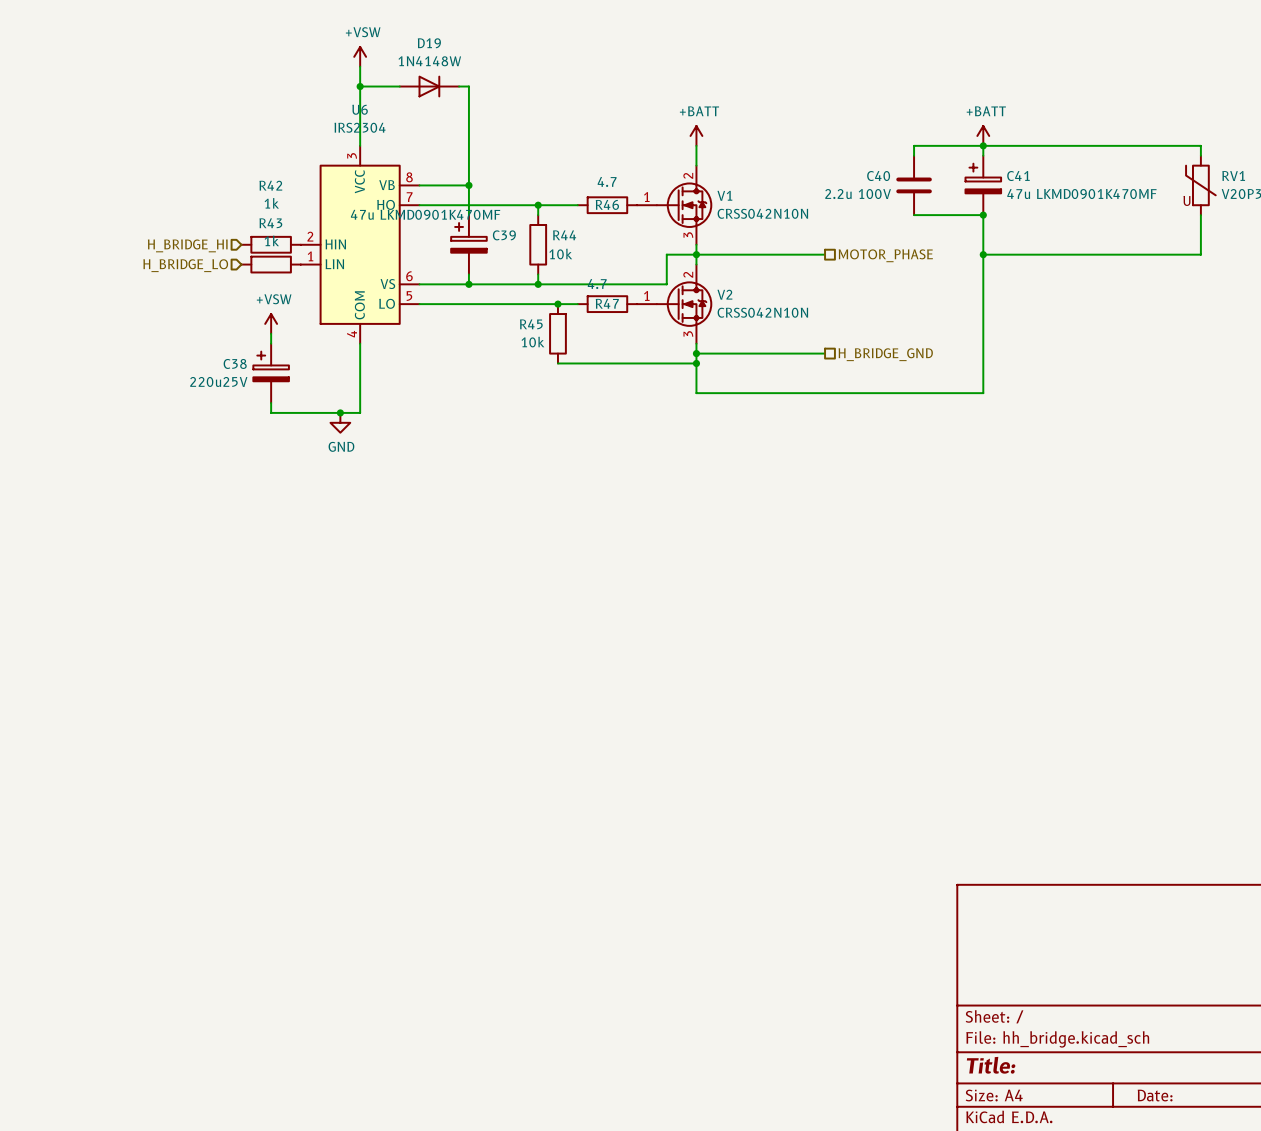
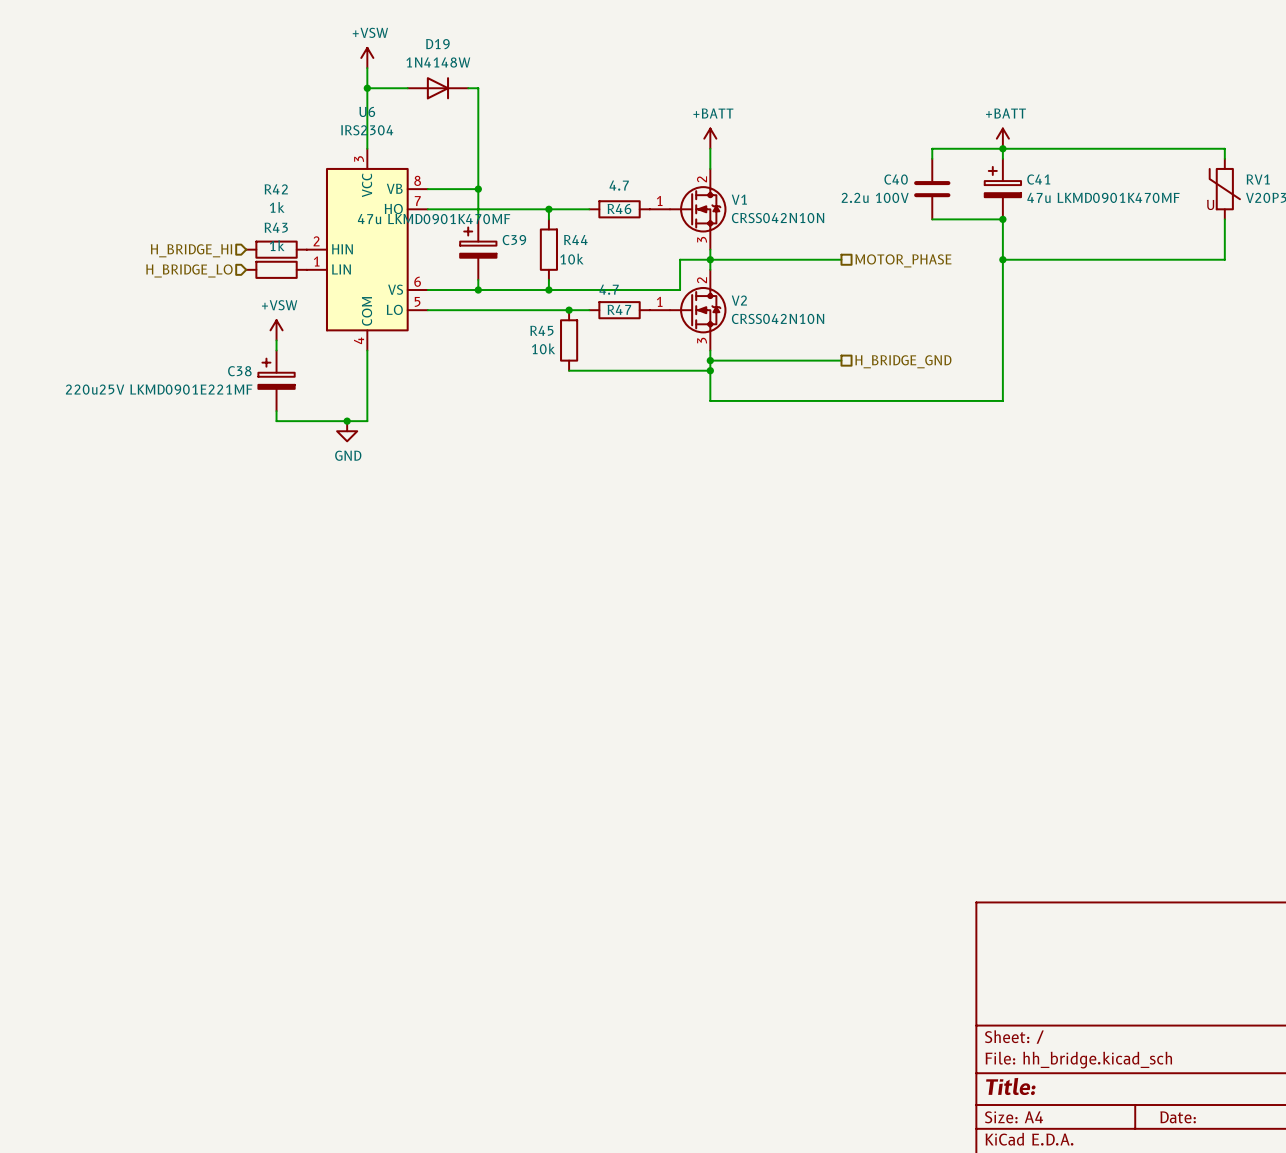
C38 value: 220u25V (218, 381) -> 220u25V LKMD0901E221MF (159, 389)

